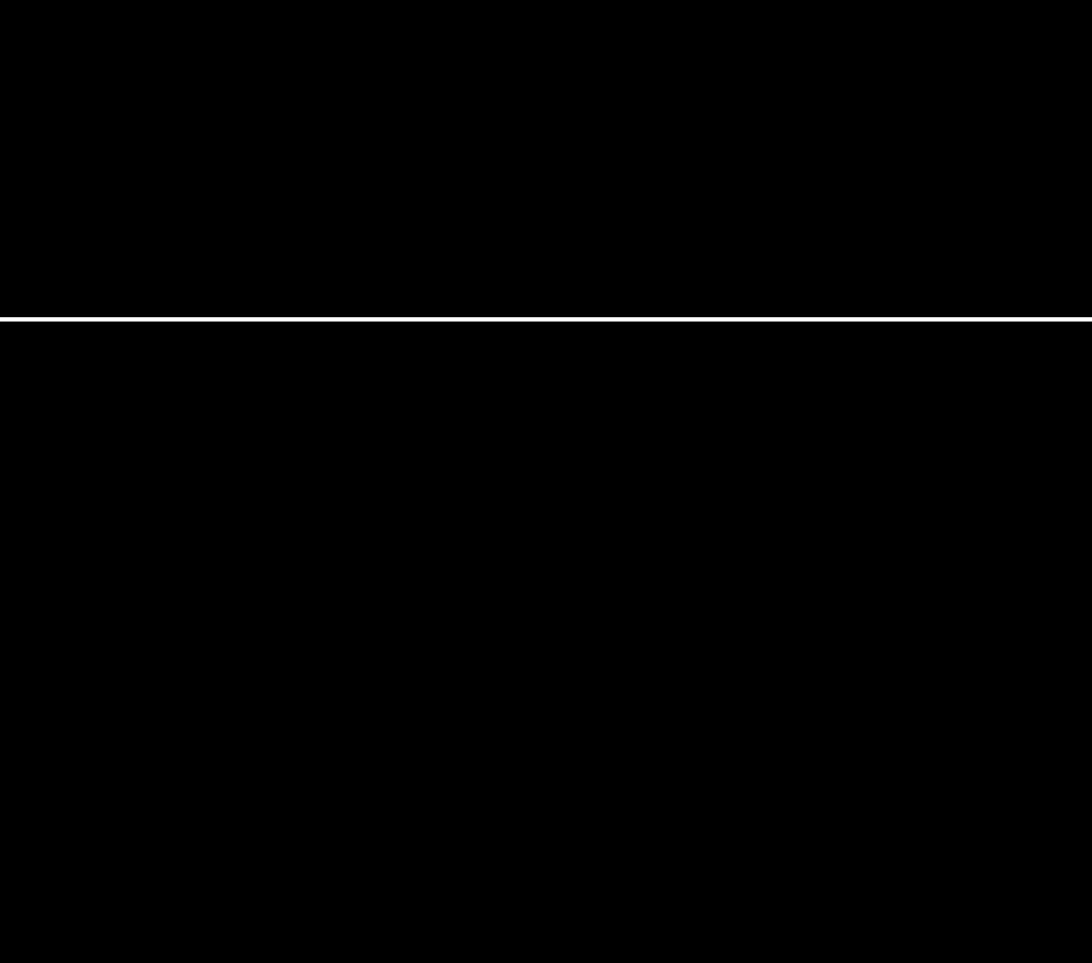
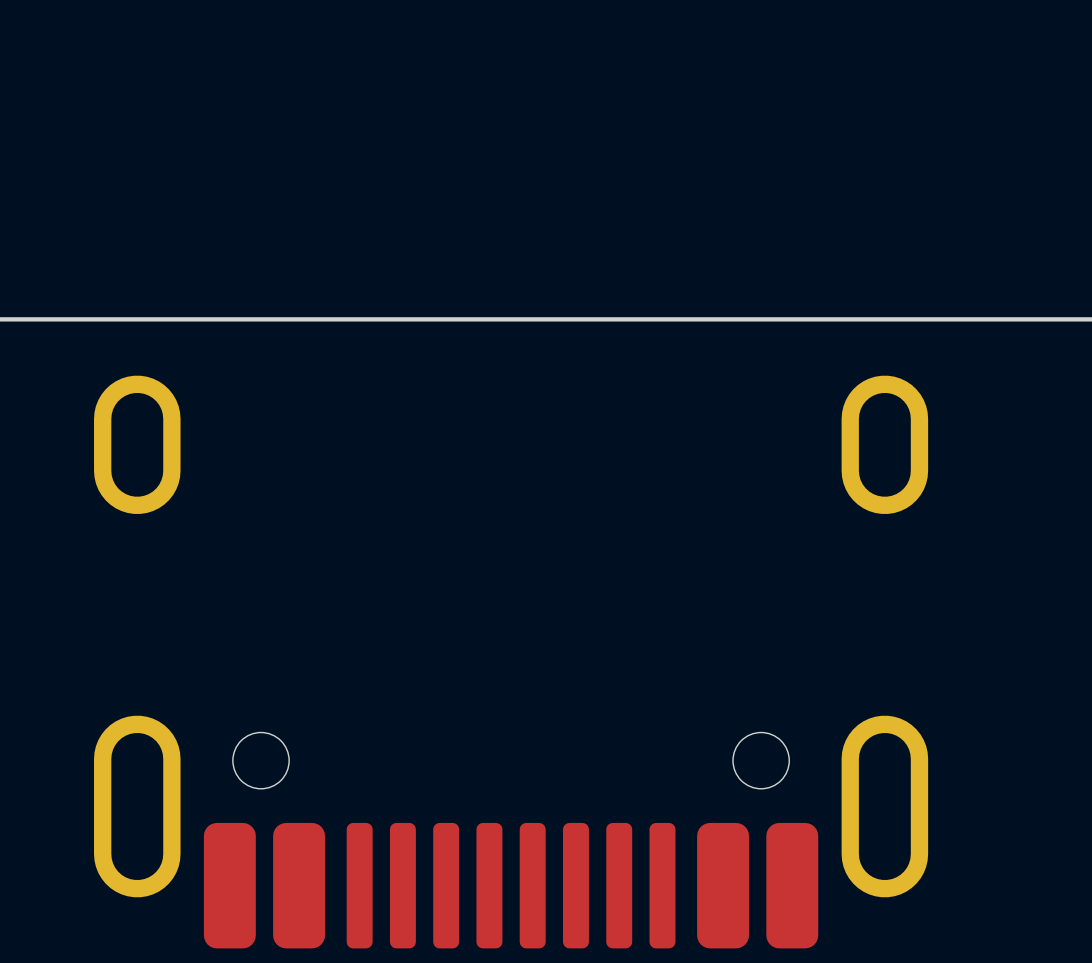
part: none -> (511, 662)

